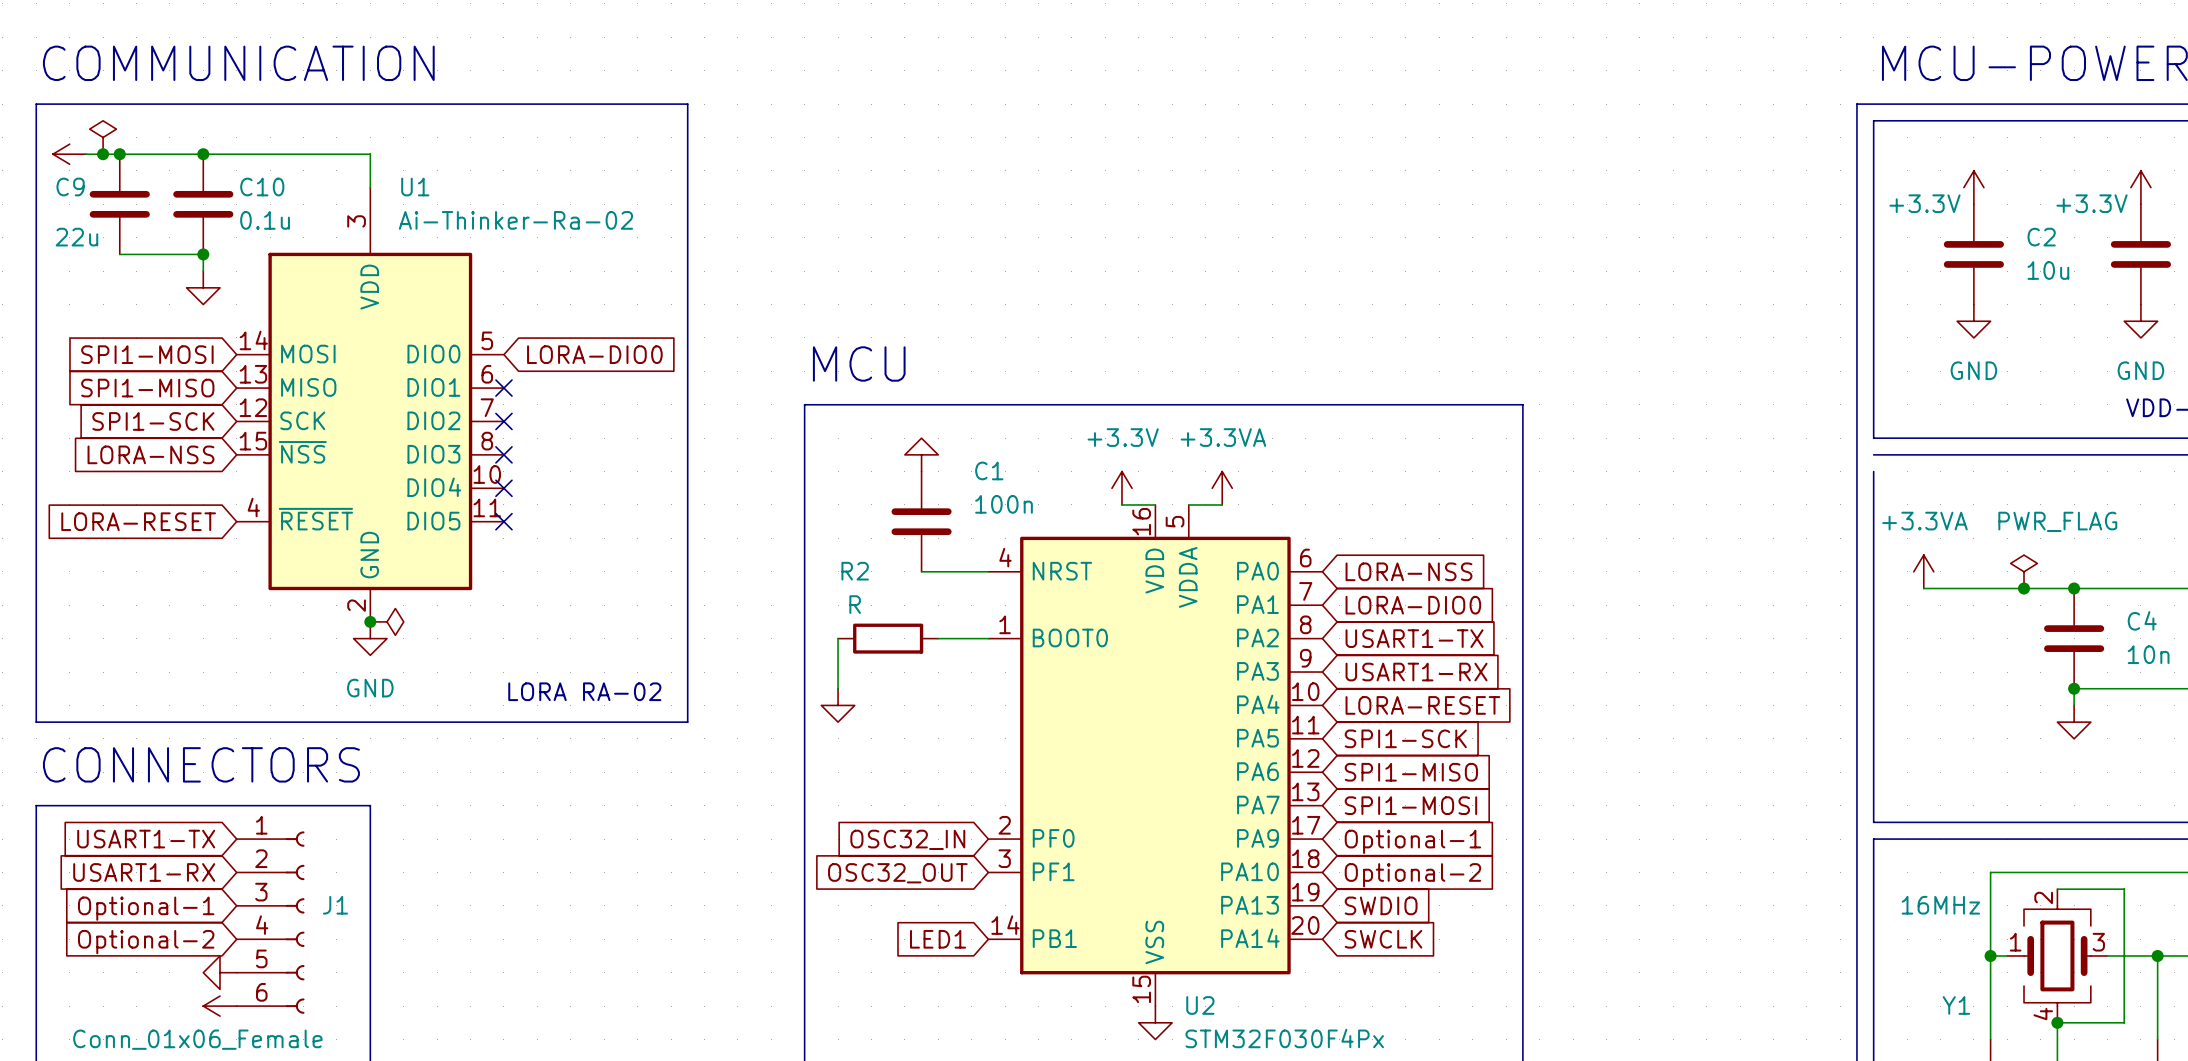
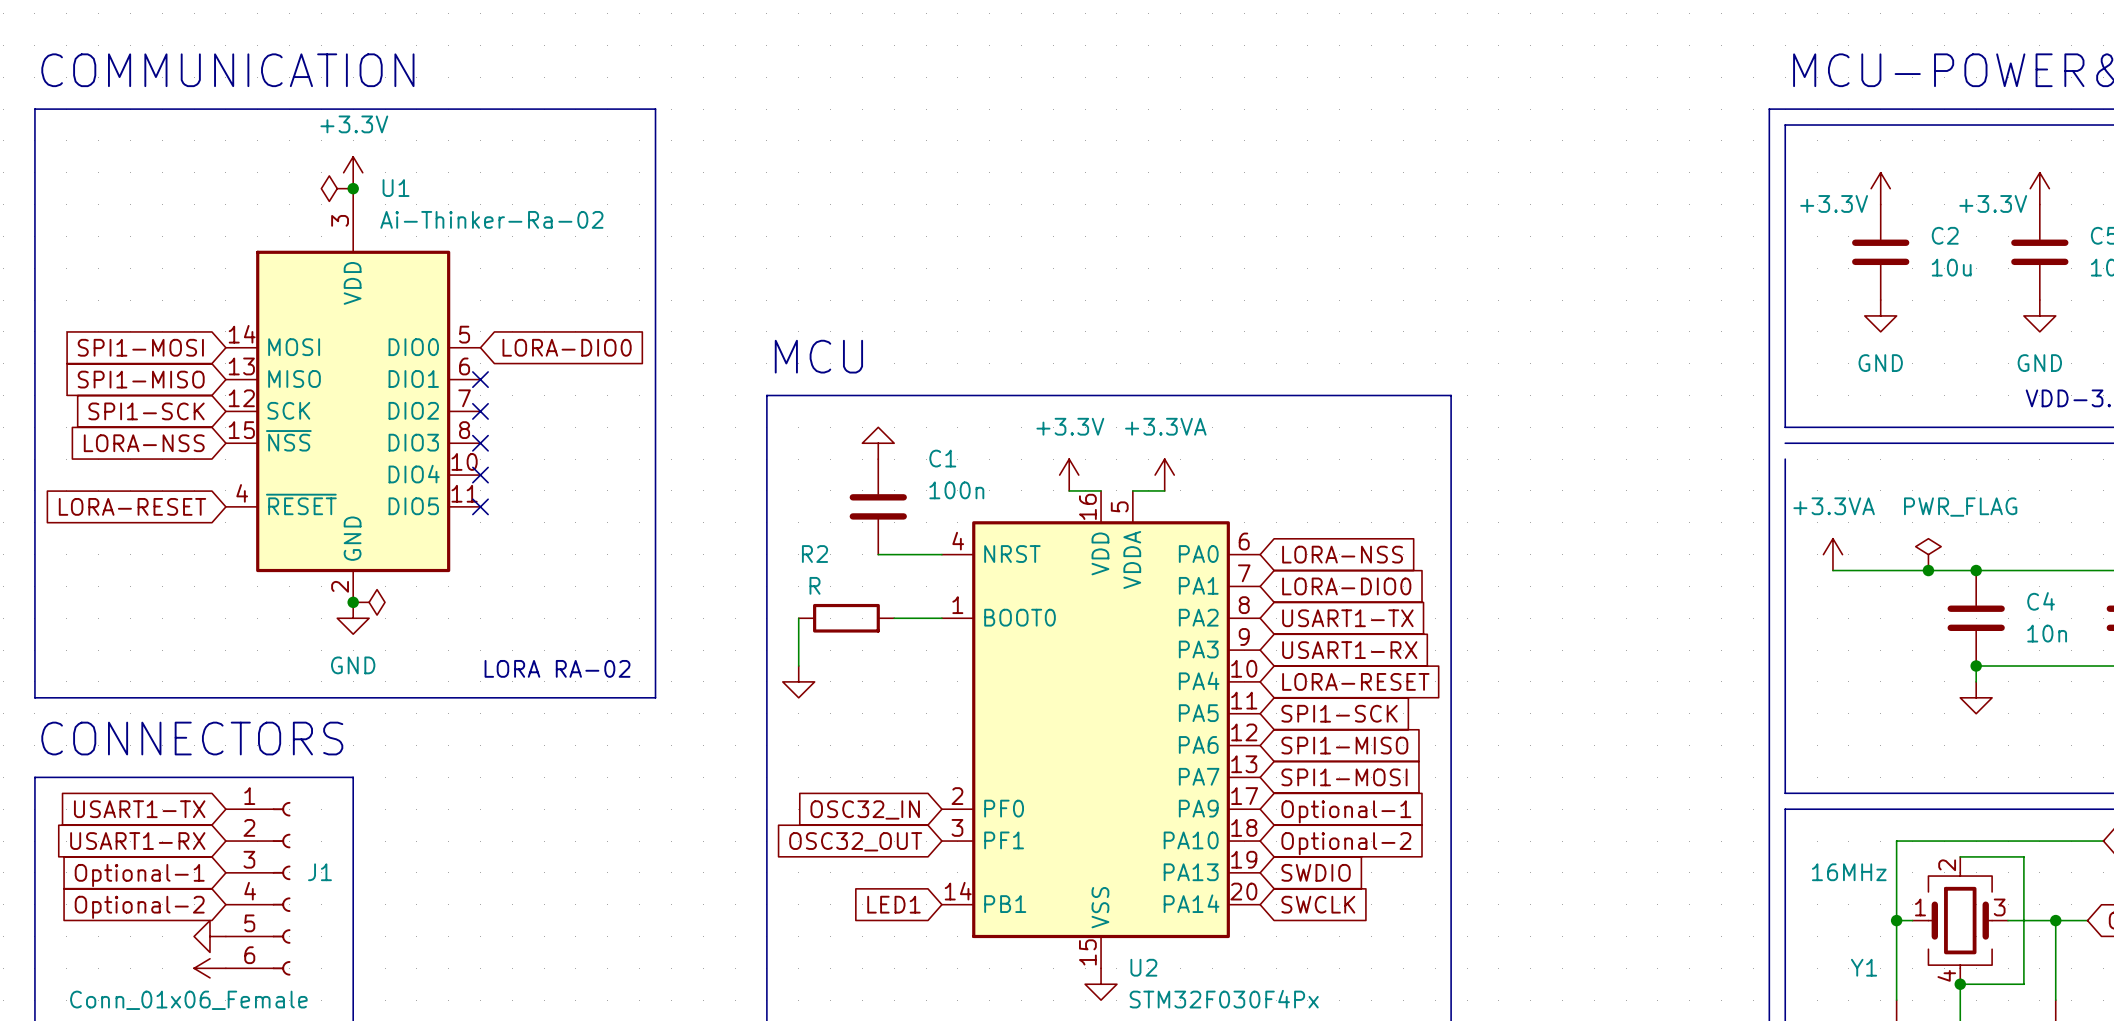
power symbol rotation: 0° (103, 137) -> 90° counterclockwise (337, 188)
power symbol position: (103, 137) -> (337, 188)
power symbol: (69, 154) -> none
wire: (86, 154) (370, 154) (370, 187) -> none
junction: (103, 154) -> none
junction: (119, 154) -> none
junction: (203, 154) -> none
power symbol: none -> +3.3V (353, 172)
junction: none -> (353, 188)
C9: 22u (119, 204) -> none
C10: 0.1u (203, 204) -> none
wire: (119, 254) (203, 254) (203, 271) -> none
junction: (203, 254) -> none
power symbol: (203, 287) -> none

